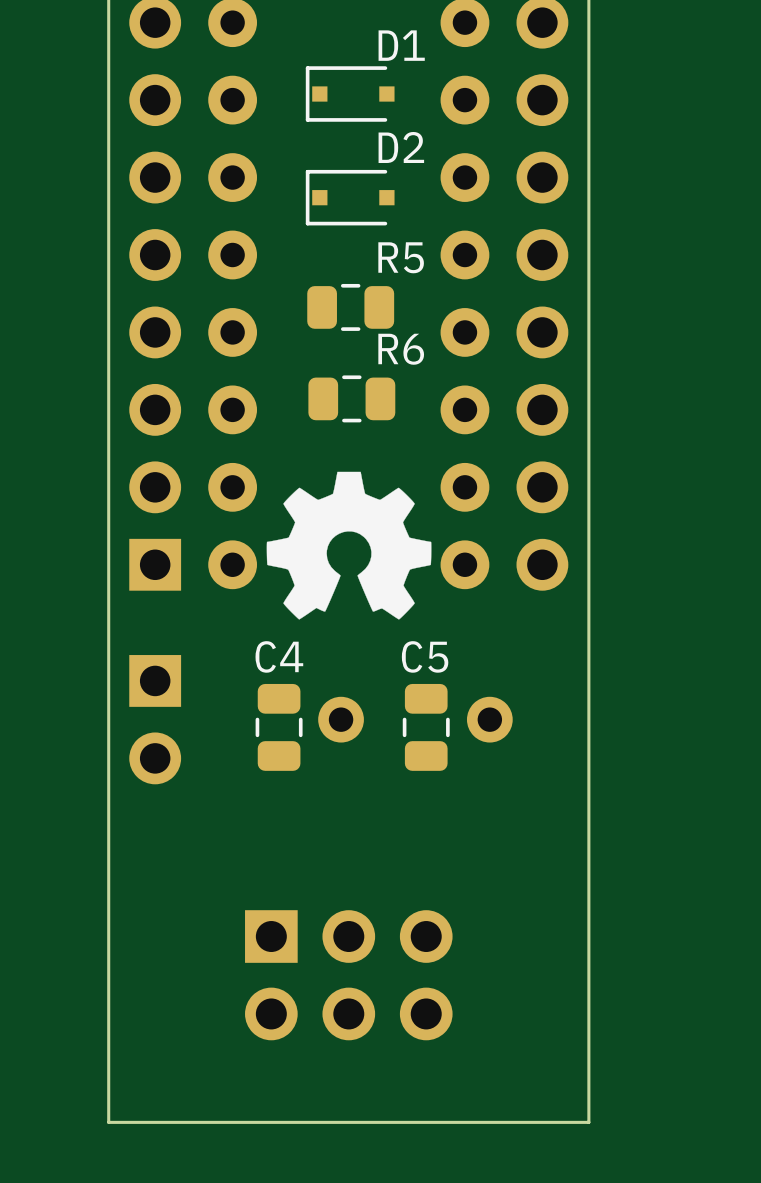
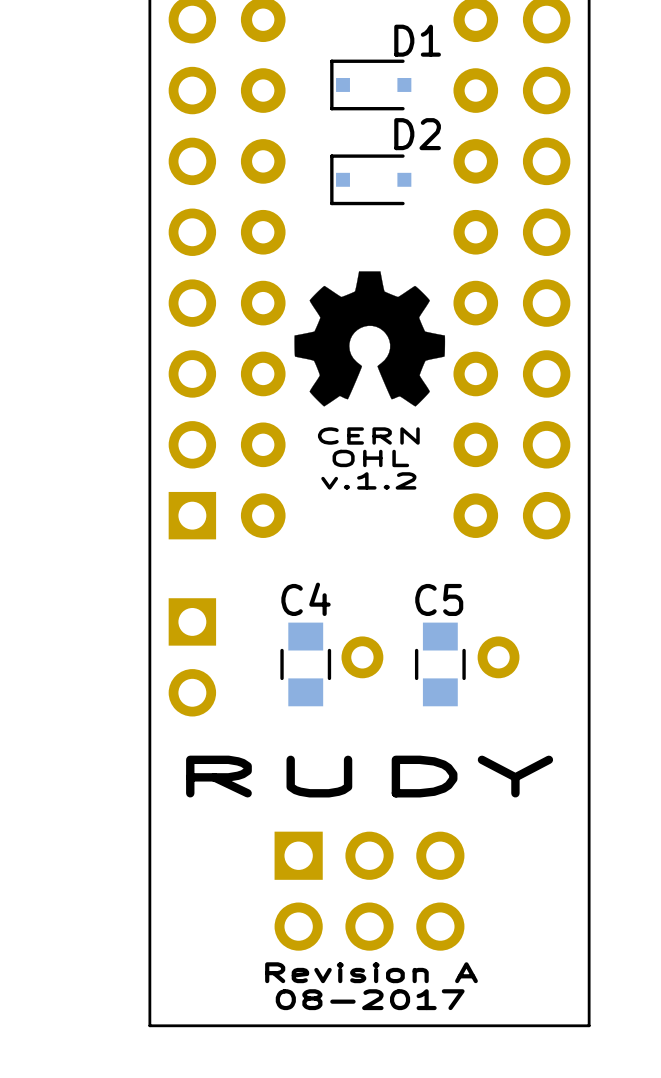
R5: (350, 307) -> none
R6: (351, 398) -> none
text: none -> CERN (368, 436)
text: none -> OHL (370, 458)
text: none -> v.1.2 (368, 480)
drawing position: (349, 545) -> (369, 338)
C4 footprint: [255, 683, 303, 771] -> [280, 622, 332, 707]
C5 footprint: [402, 683, 450, 771] -> [414, 622, 466, 707]
text: none -> RUDY (369, 776)
text: none -> Revision A (371, 972)
text: none -> 08-2017 (370, 999)

